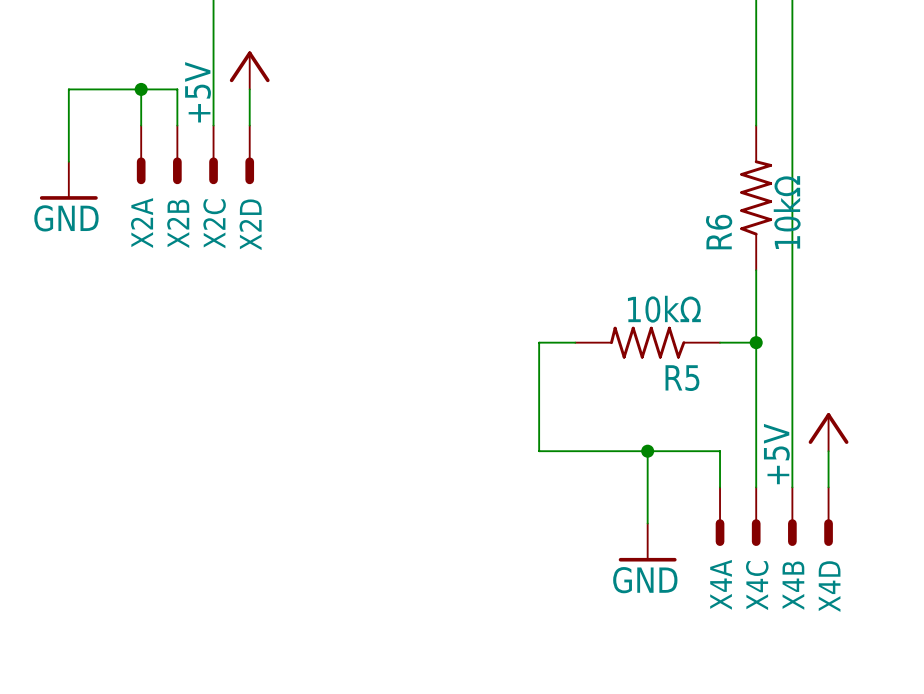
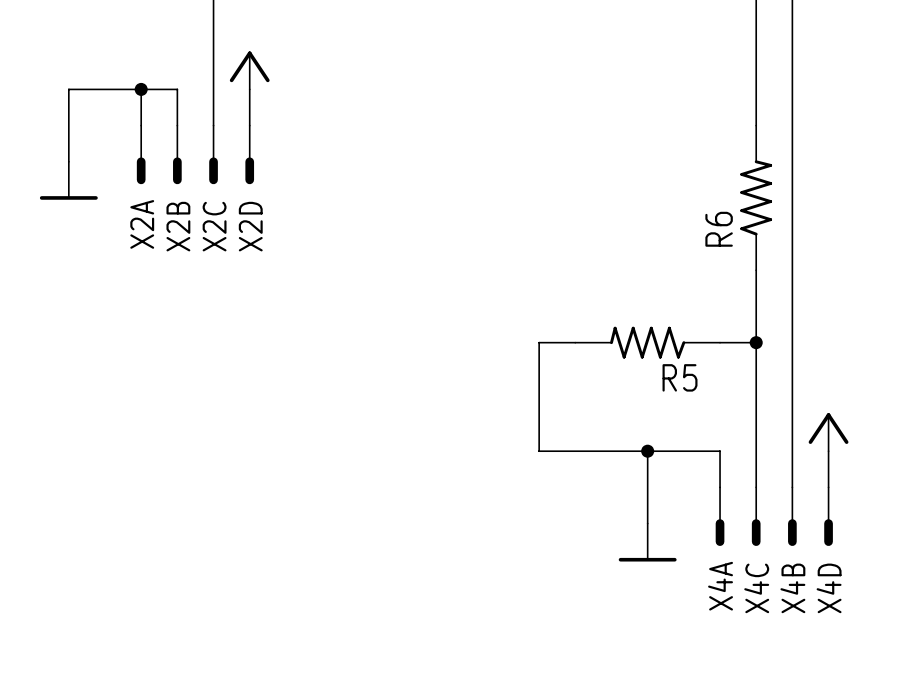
power symbol text: +5V (198, 92) -> none
R6 value: 10kΩ (787, 212) -> none
power symbol text: GND (66, 218) -> none
R5 value: 10kΩ (664, 309) -> none
power symbol text: +5V (776, 454) -> none
power symbol text: GND (645, 580) -> none

